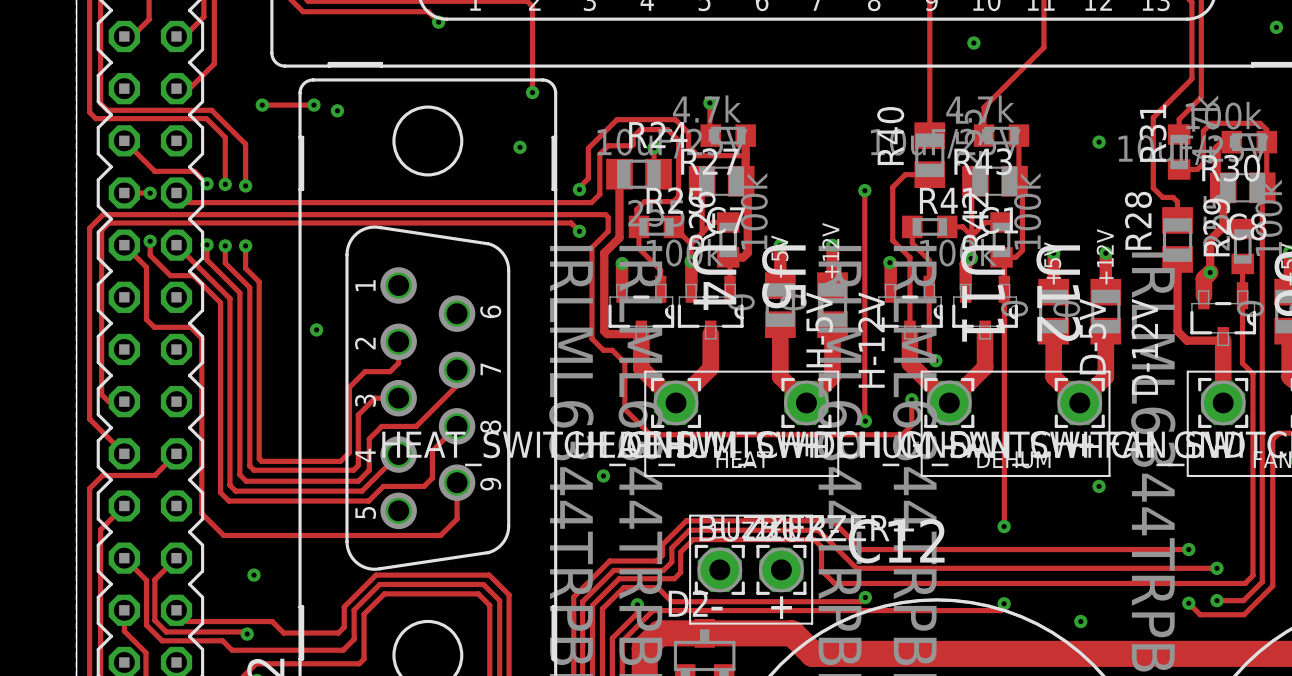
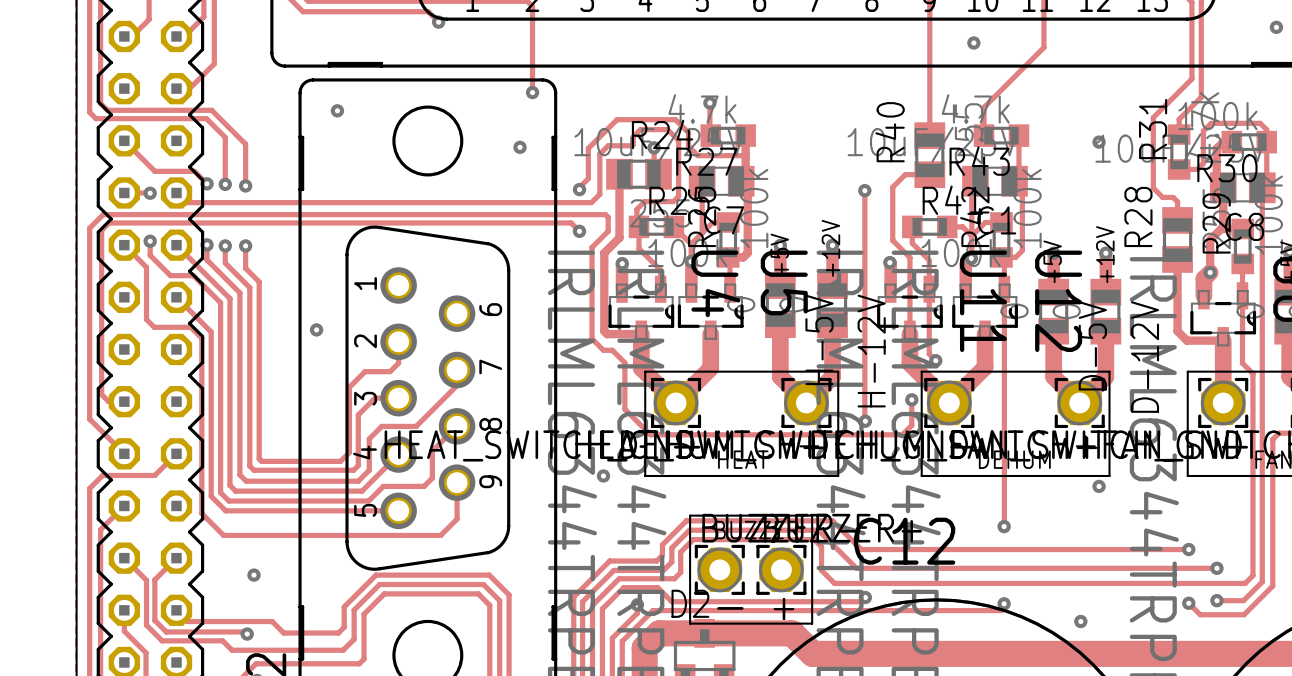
track: (262, 105) (313, 105) -> none
via: (262, 105) -> none
via: (313, 105) -> none
track: none -> (176, 297) (211, 332) (211, 496) (225, 510) (398, 510)

